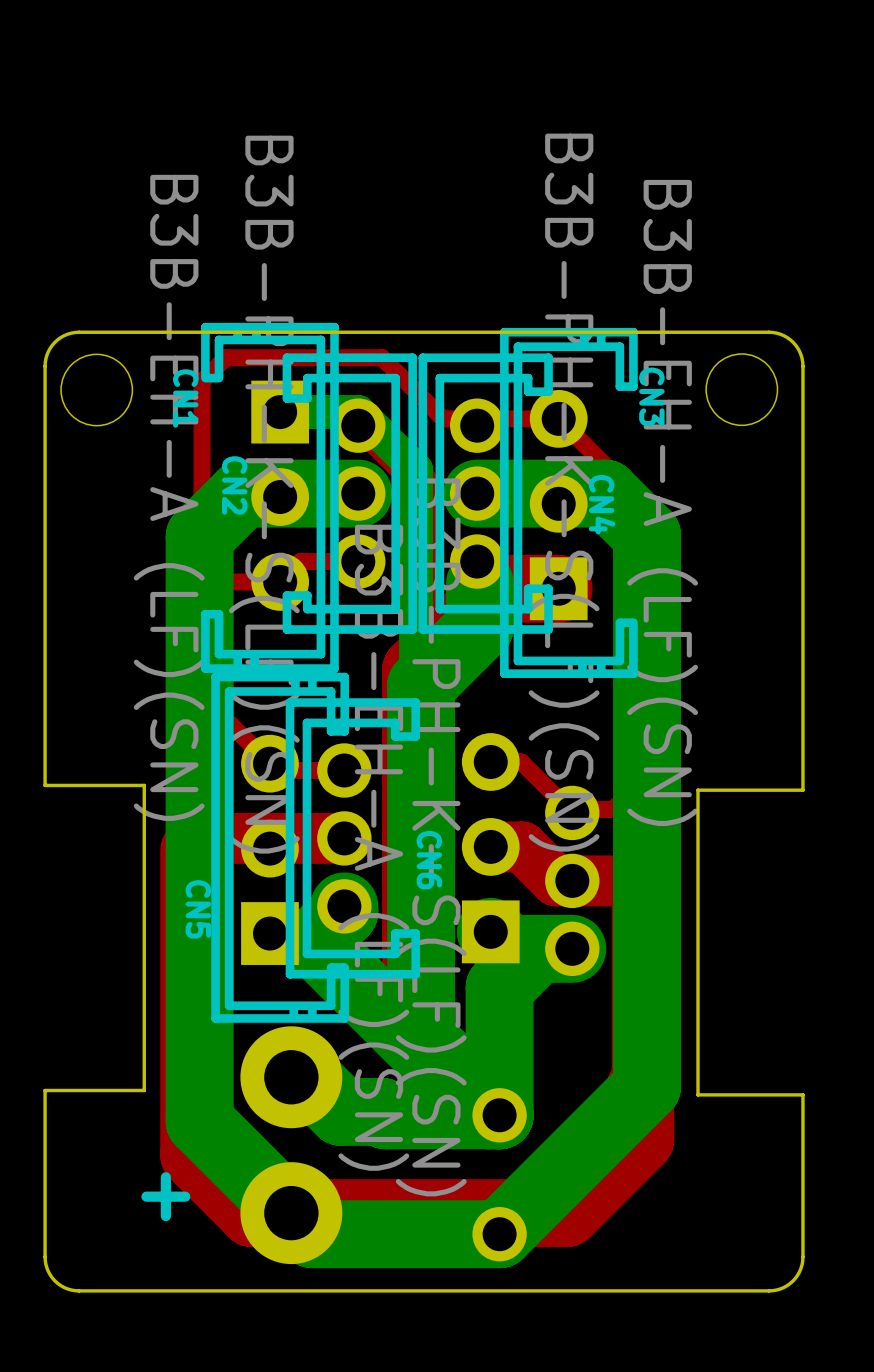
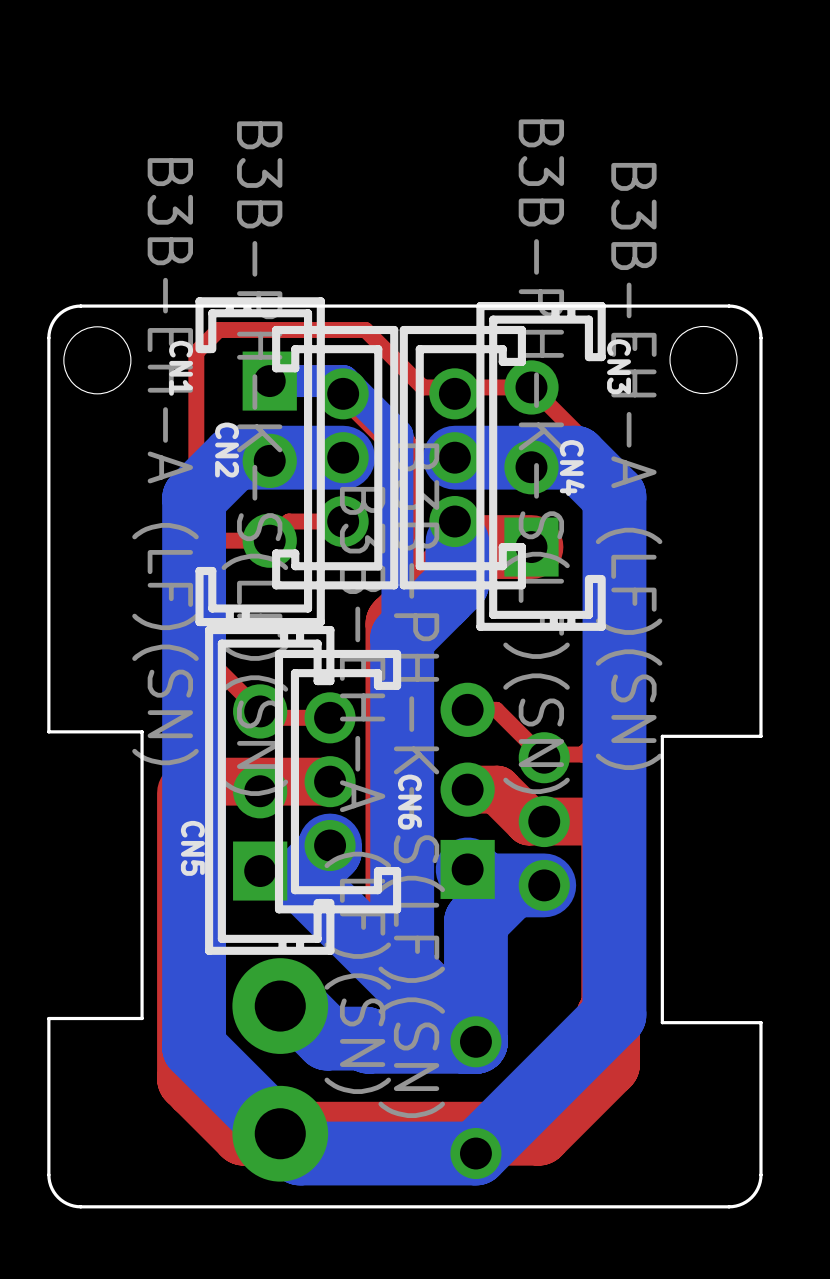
text: + (165, 1196) -> none

